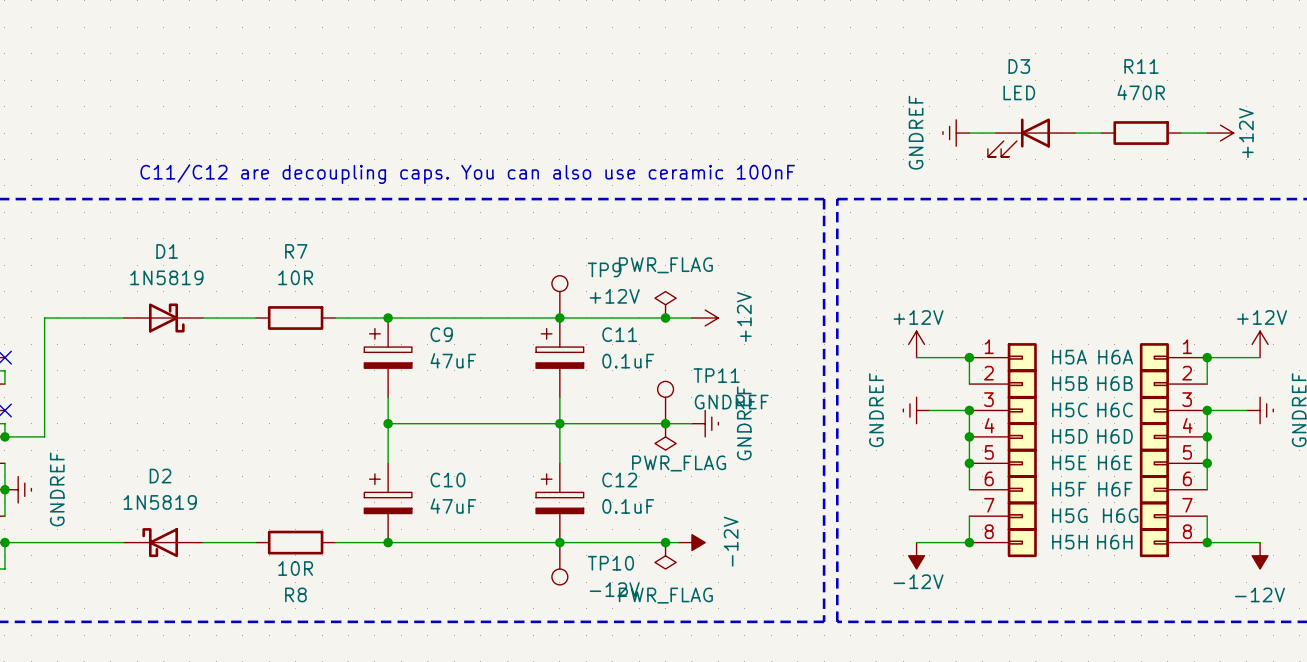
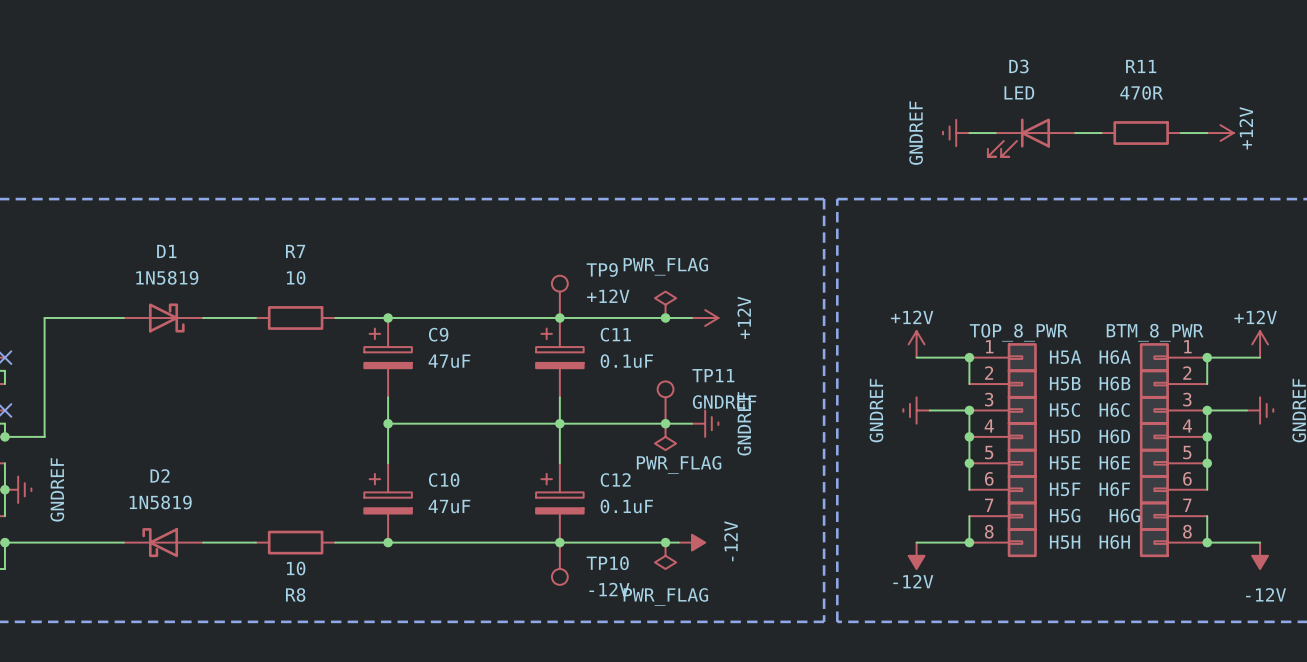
text: C11/C12 are decoupling caps. You can also use ceramic 100nF (467, 174) -> none
R7 value: 10R (295, 277) -> 10 (296, 277)
H5A value: none -> TOP_8_PWR (1018, 332)
H6A value: none -> BTM_8_PWR (1155, 332)
R8 value: 10R (295, 568) -> 10 (296, 568)

